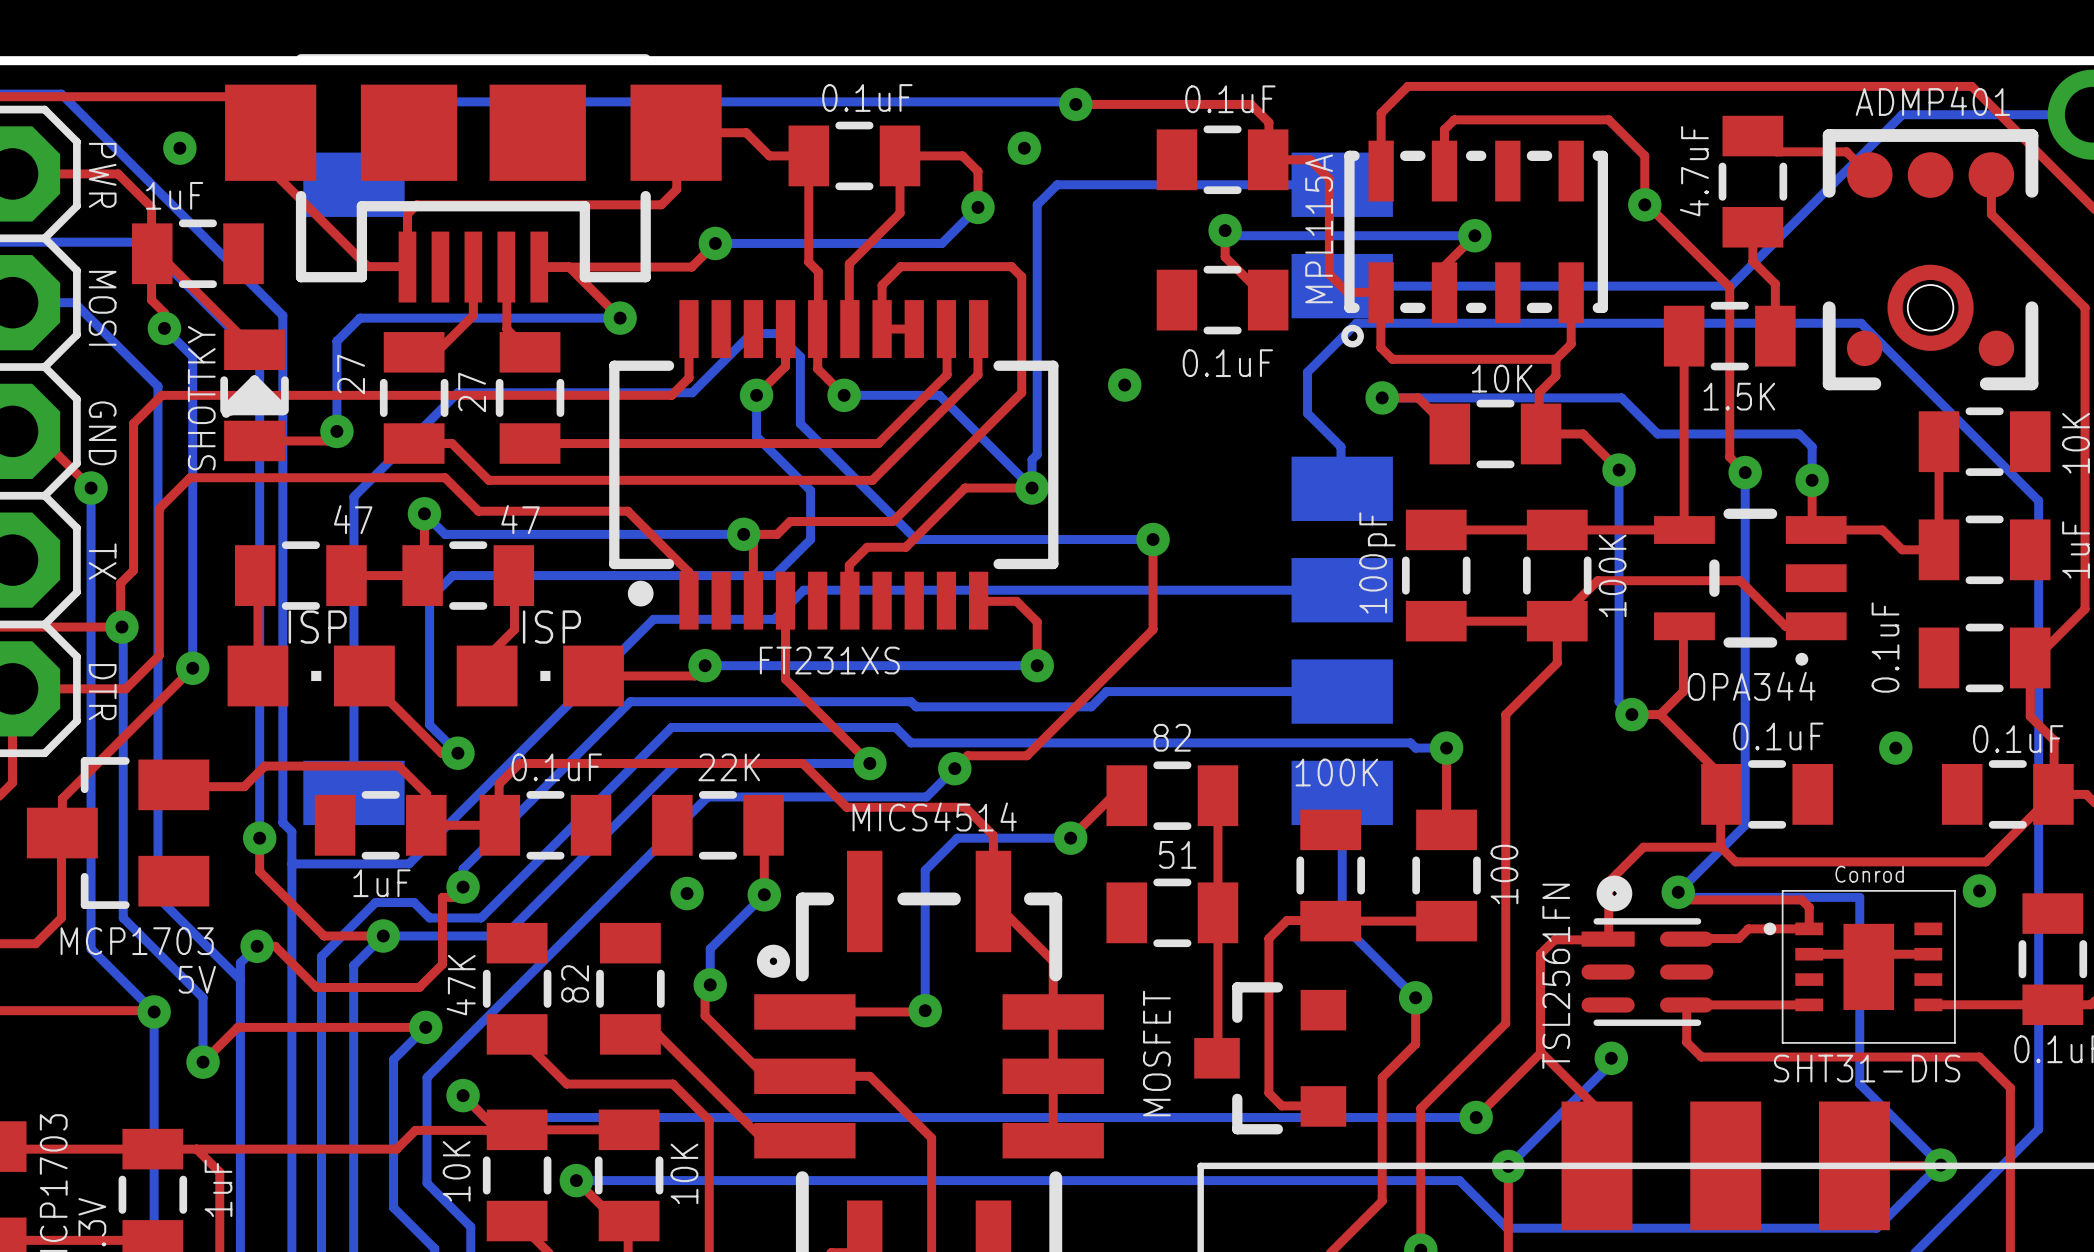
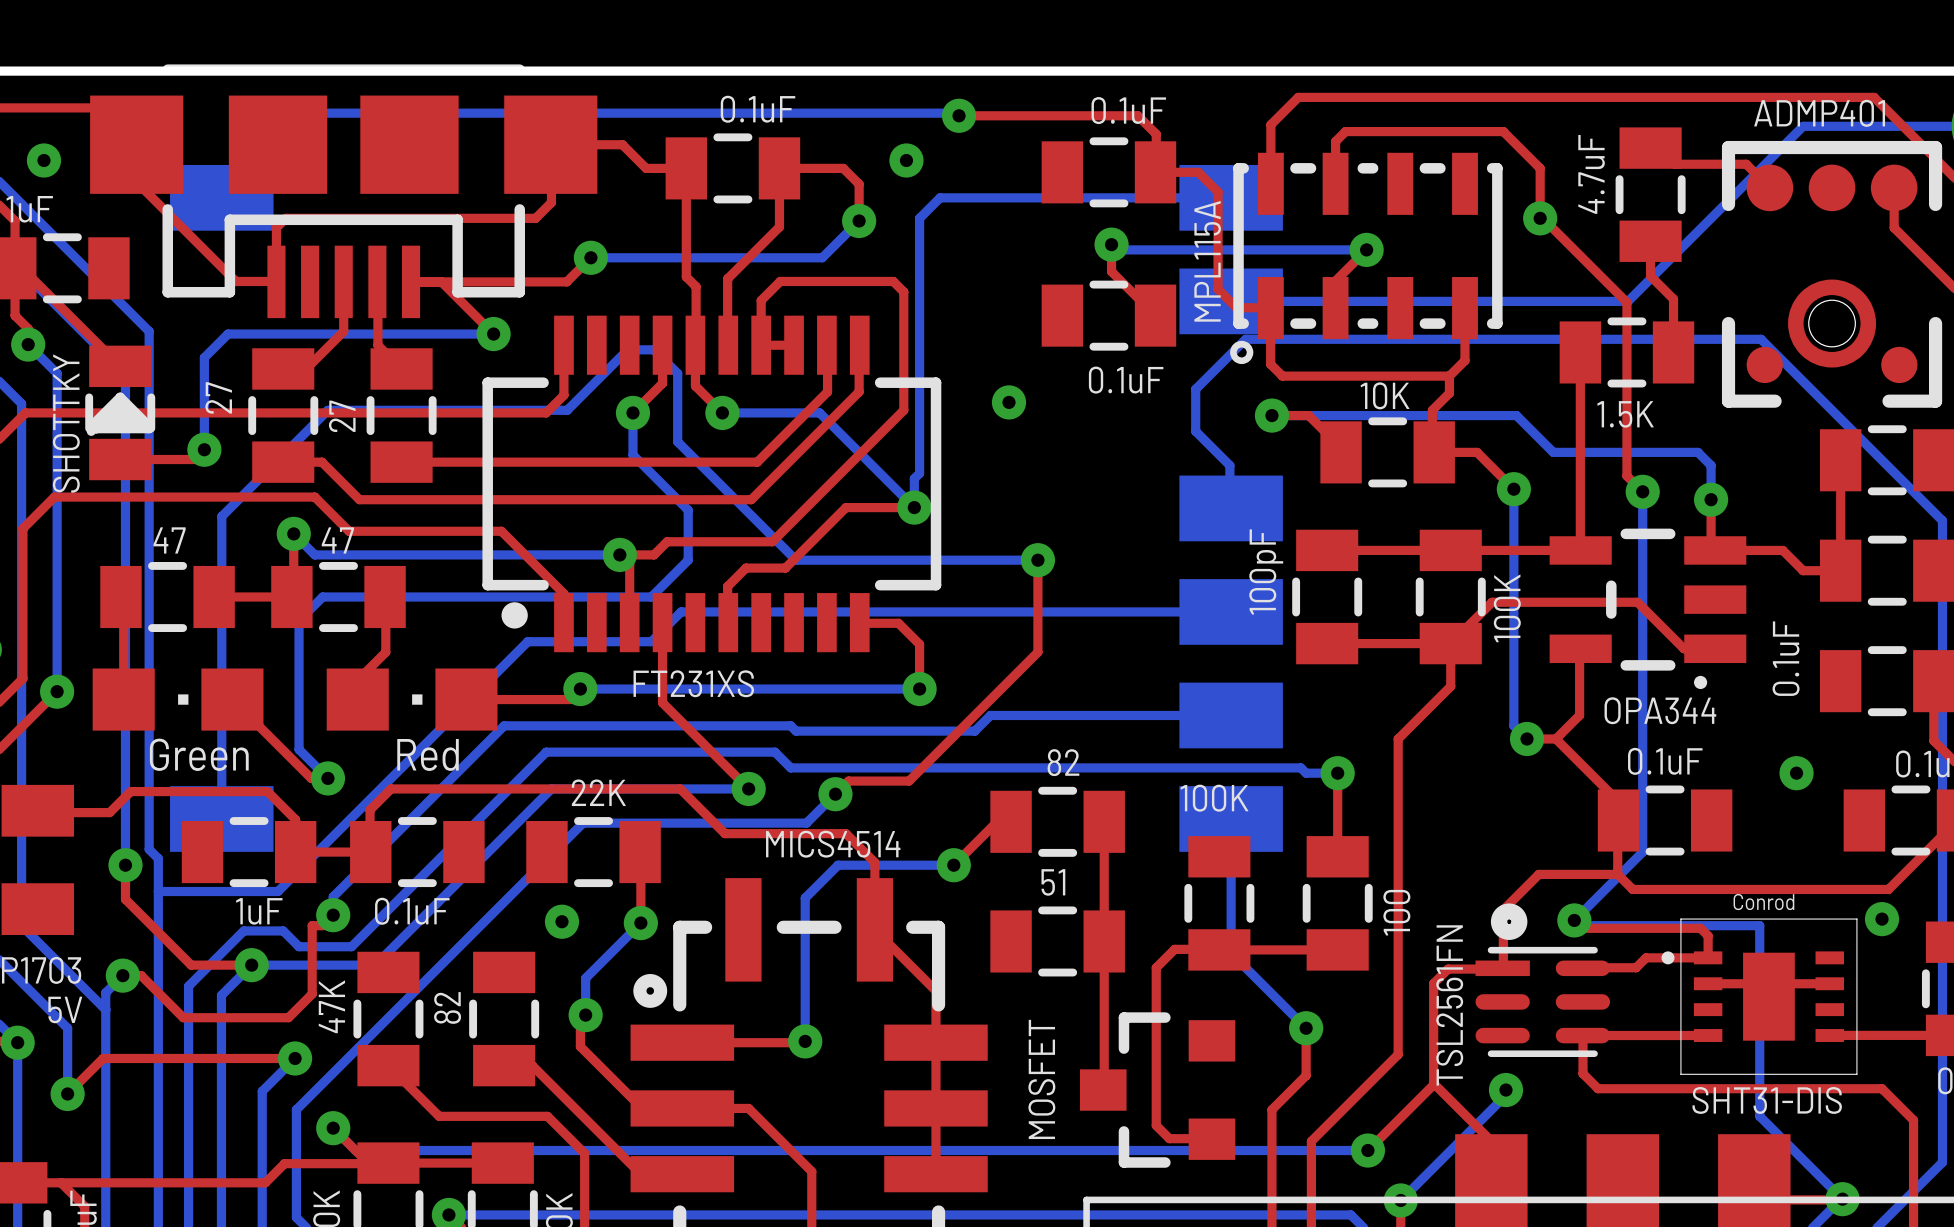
part value position: 47 (353, 519) -> 47 (169, 540)
part value position: 47 (520, 519) -> 47 (337, 540)
text: ISP (317, 627) -> none
text: ISP (551, 627) -> none
text: none -> Green (199, 754)
text: none -> Red (428, 754)
part value position: 0.1uF (556, 767) -> 0.1uF (412, 911)

